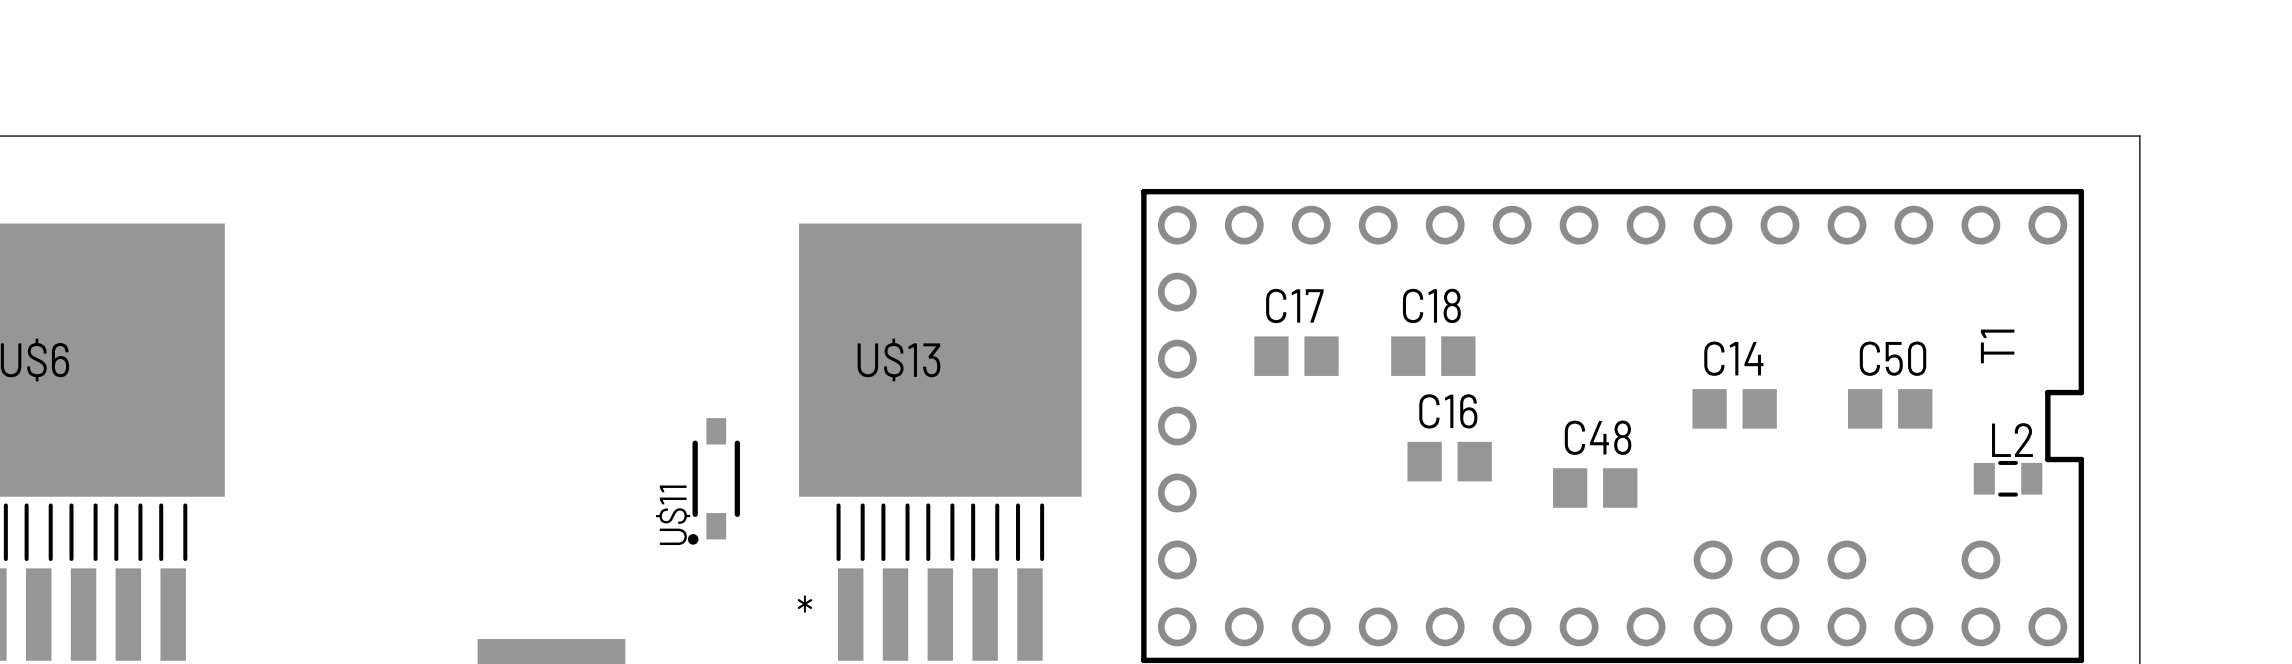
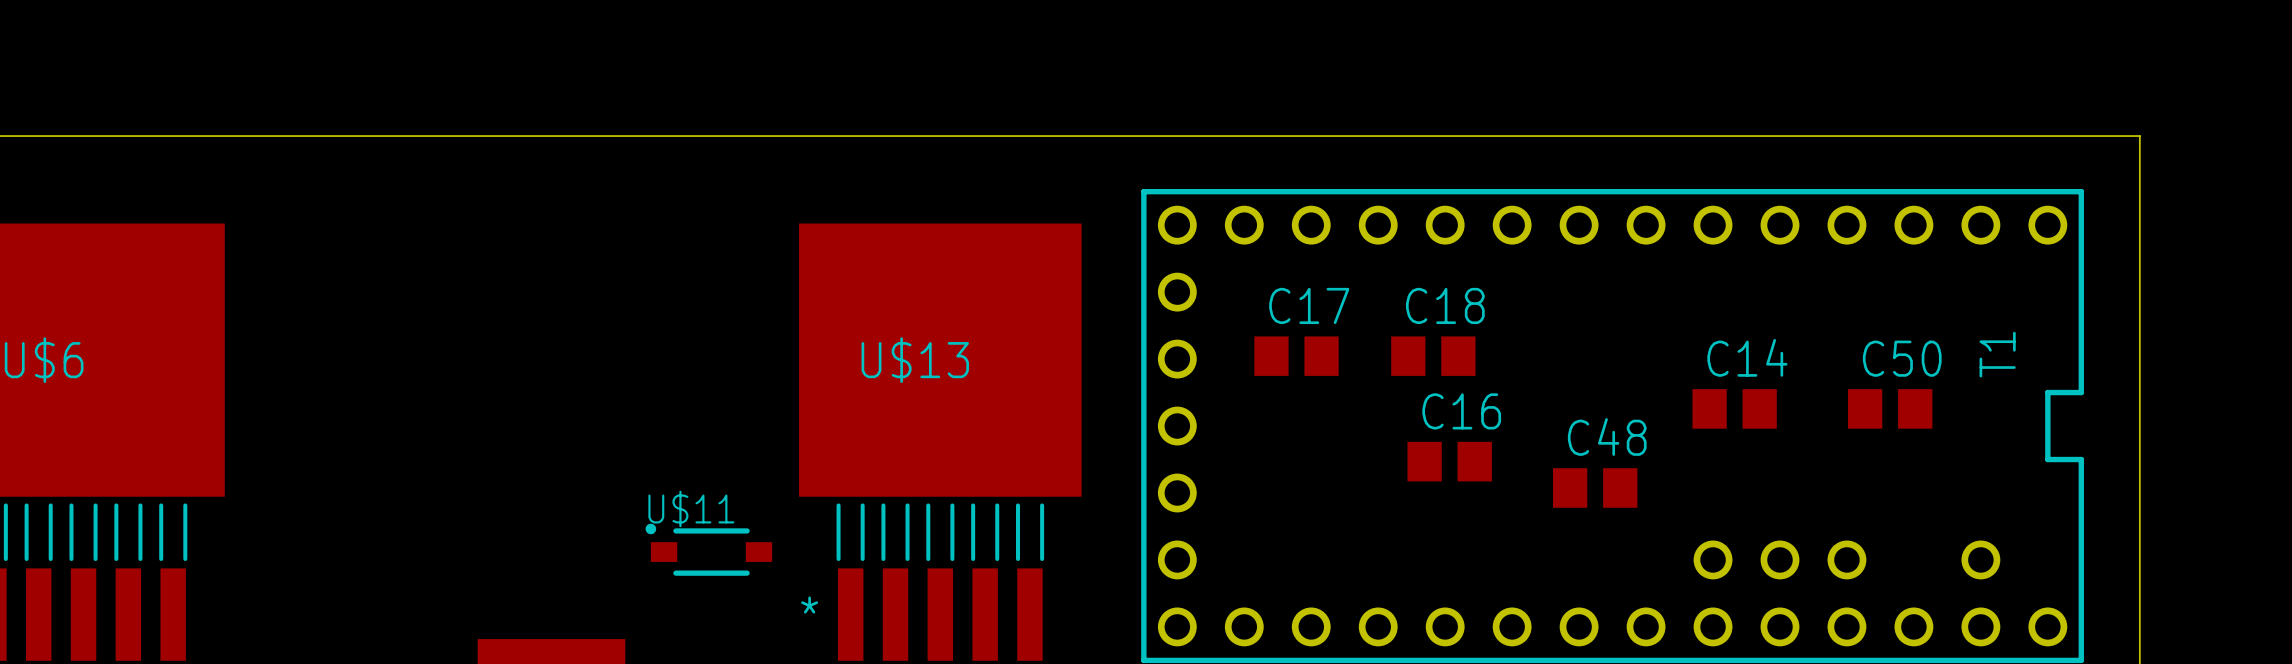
L2: (2008, 478) -> none
U$11 rotation: 0° (713, 481) -> 90° clockwise (708, 549)

